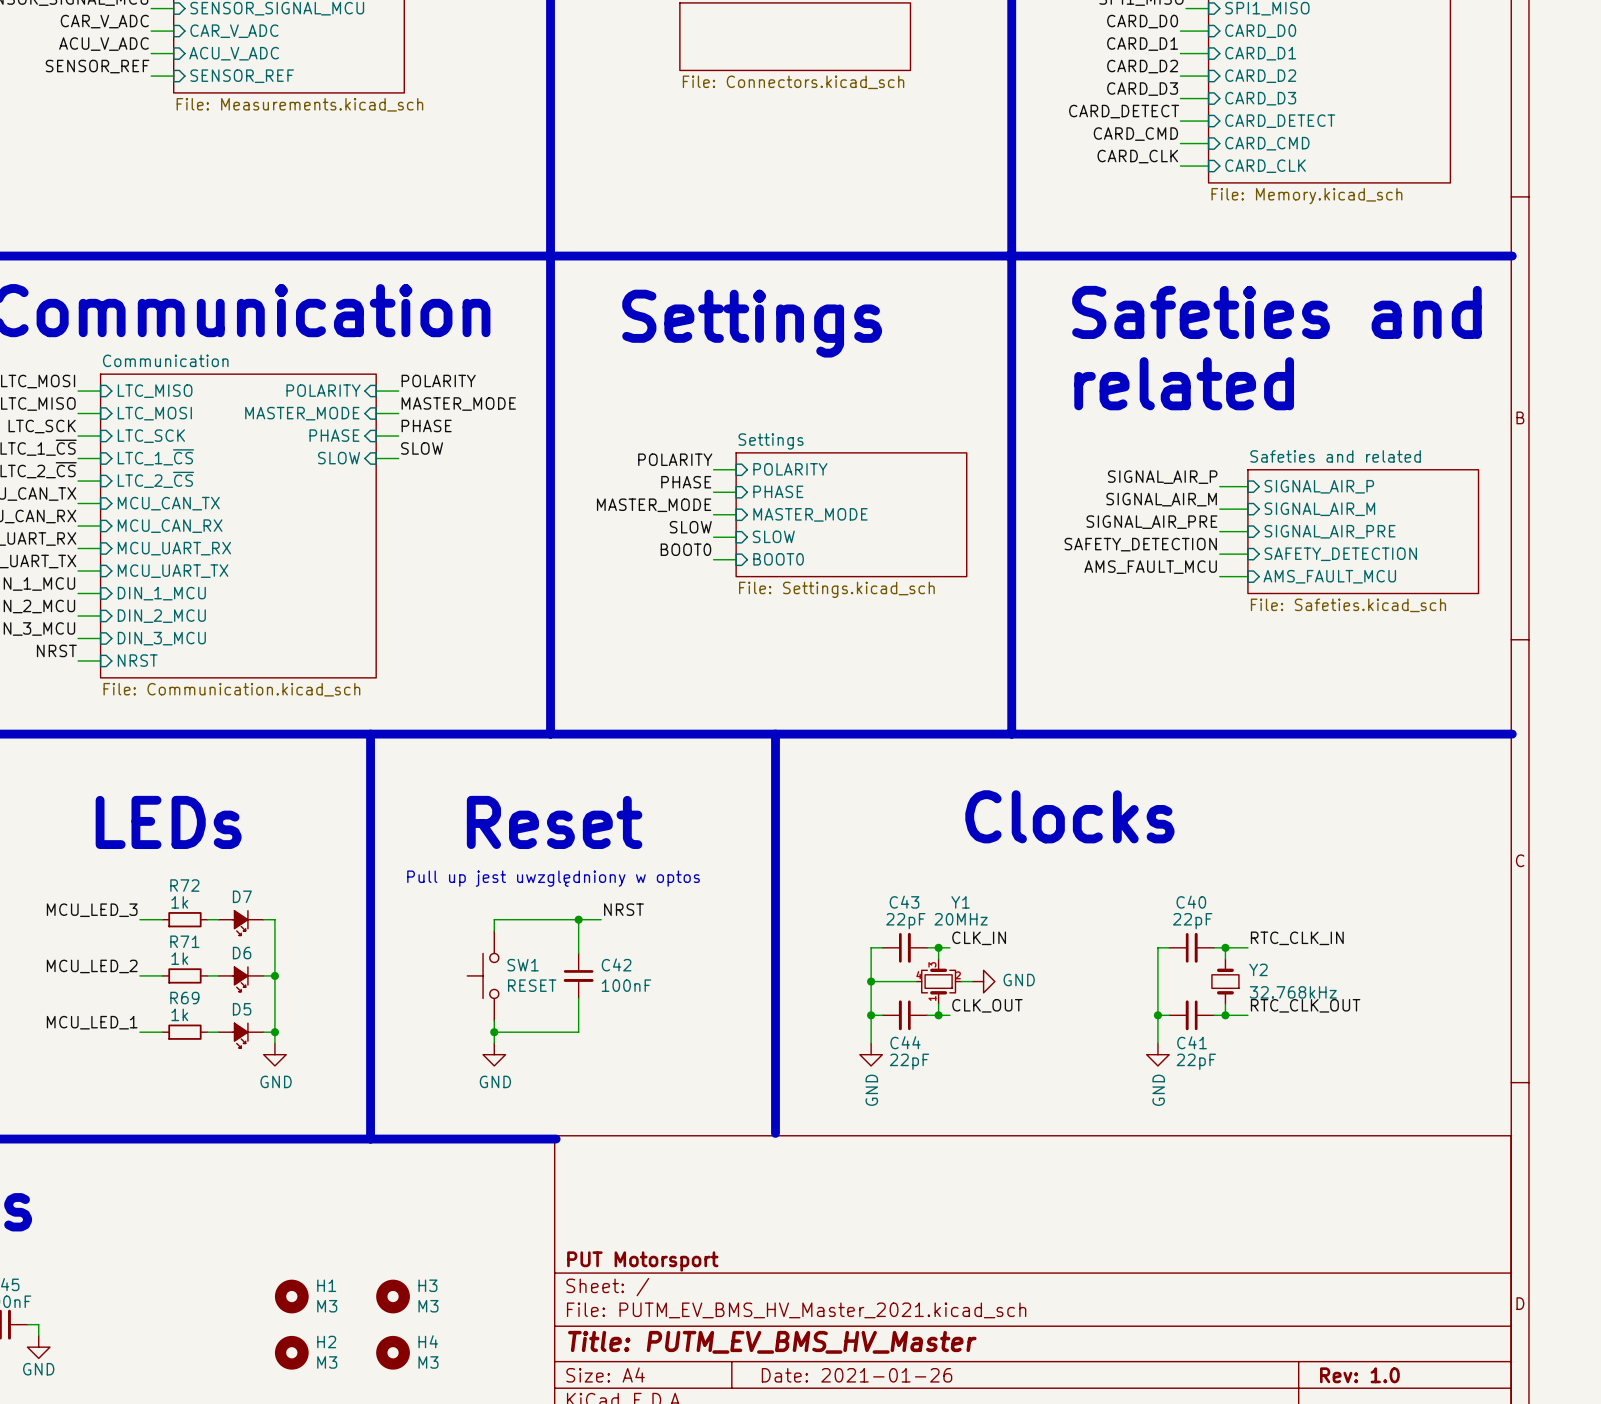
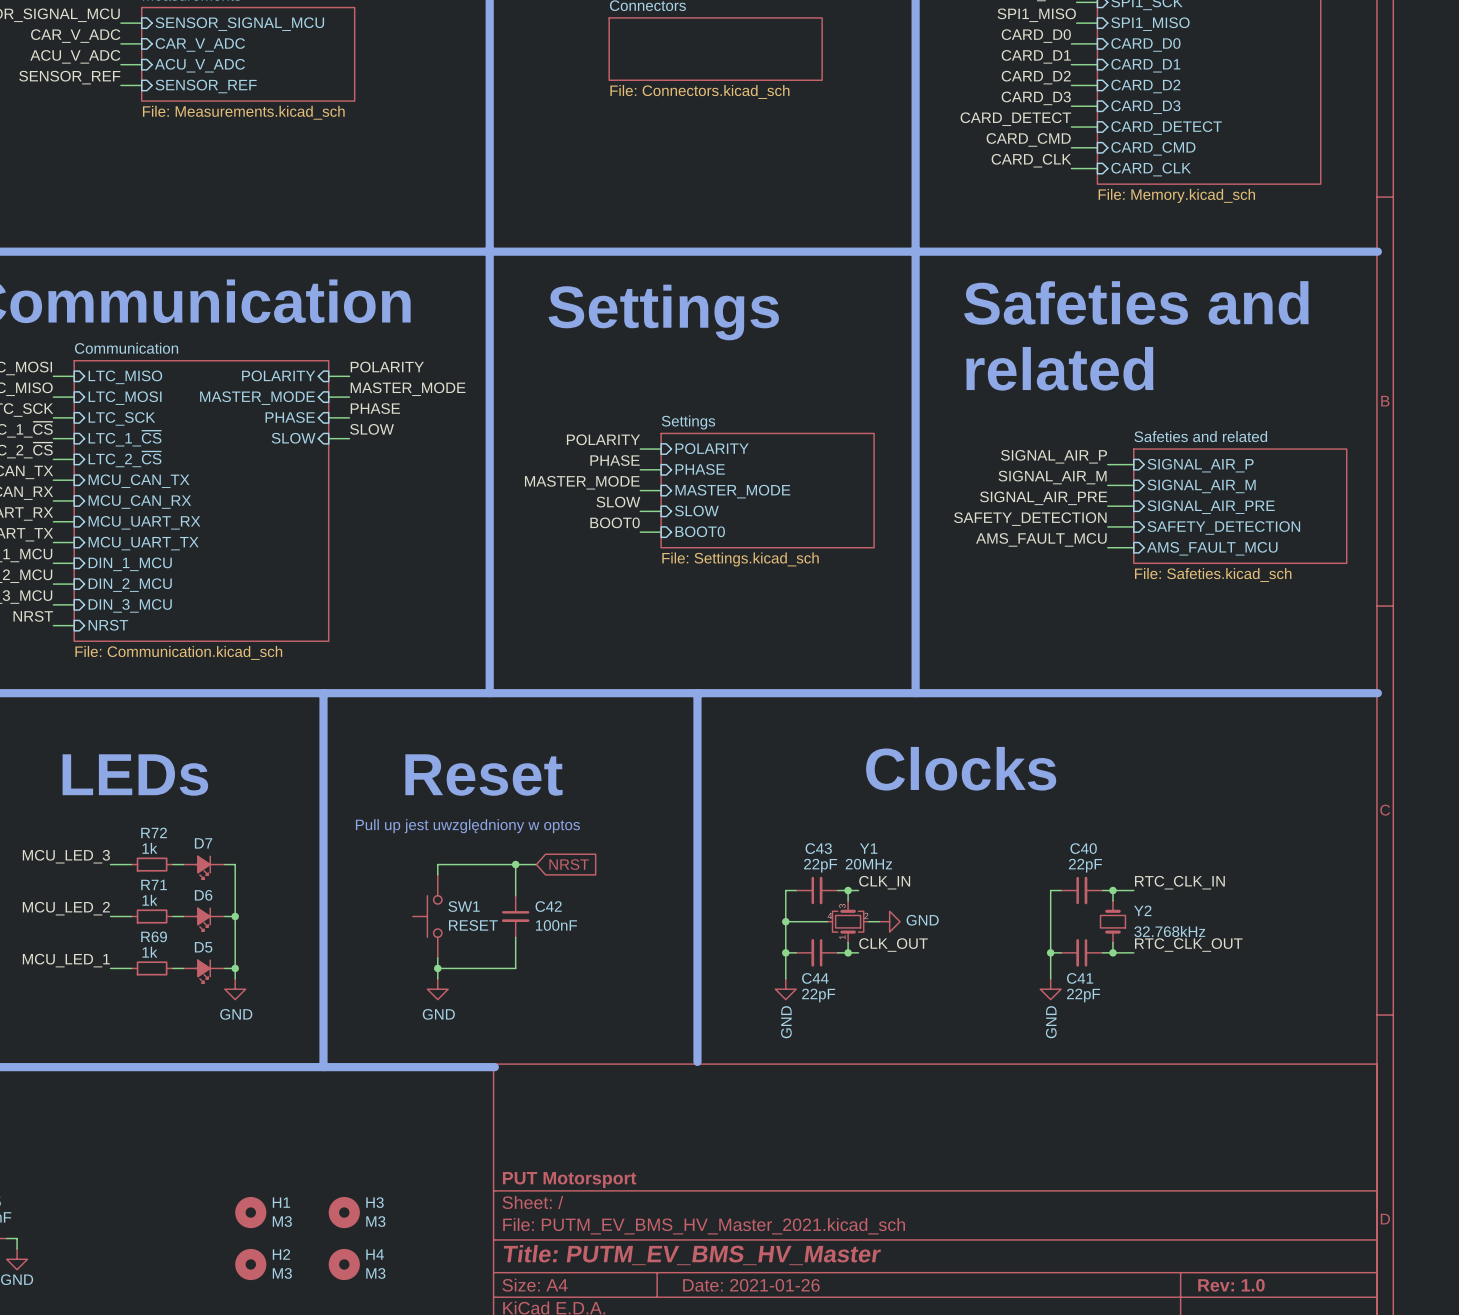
label: NRST (623, 909) -> none
global label: none -> NRST (569, 864)

